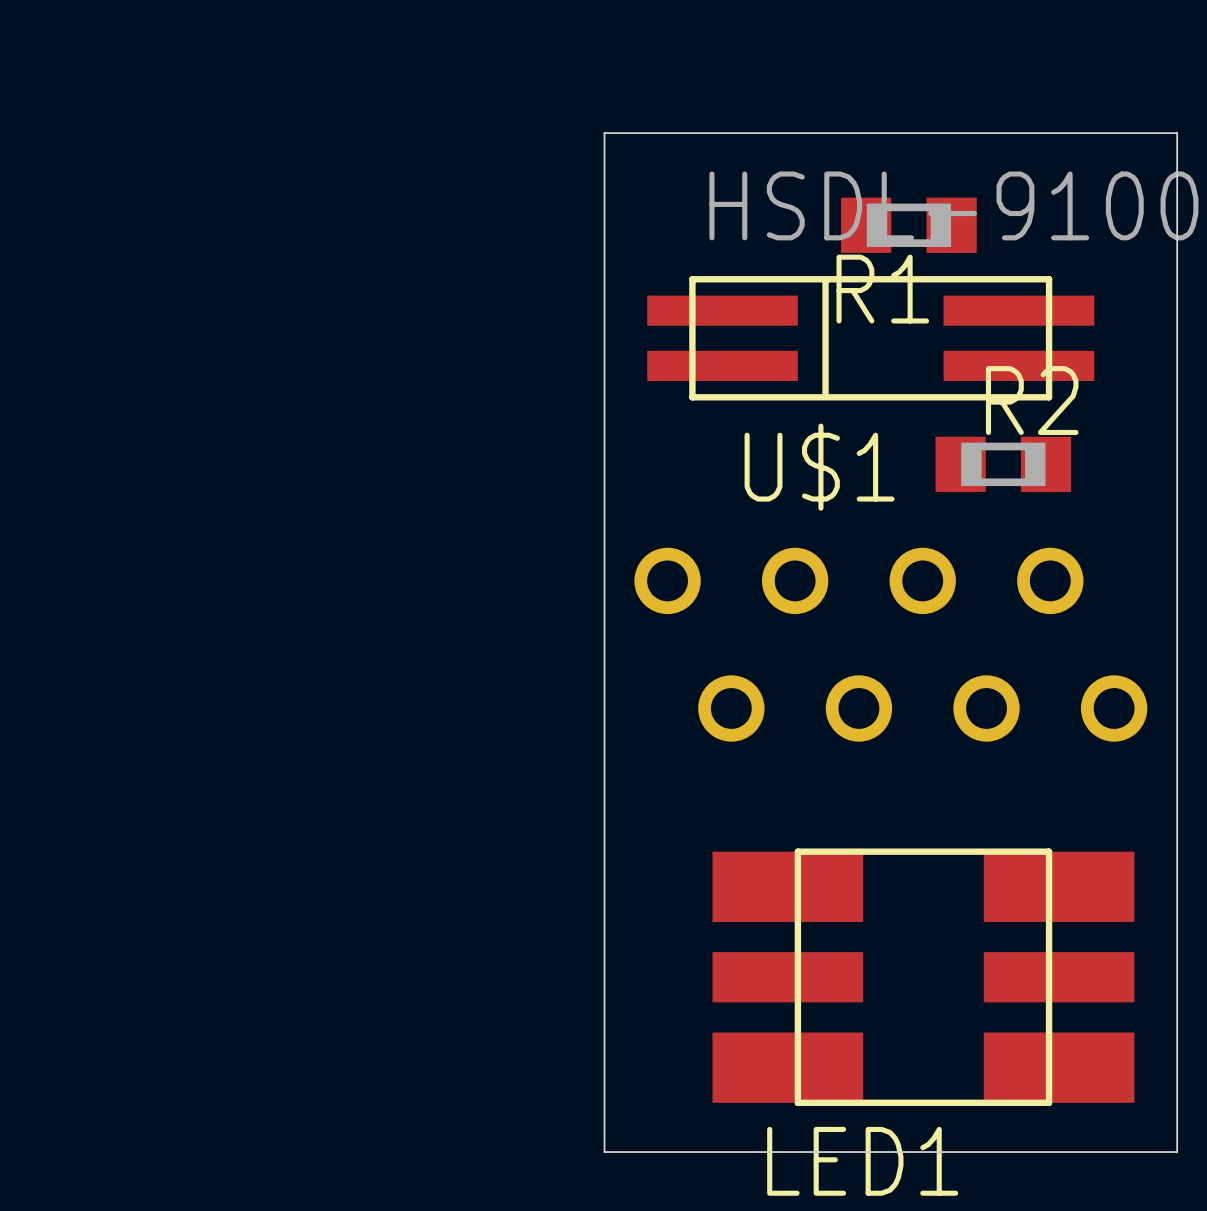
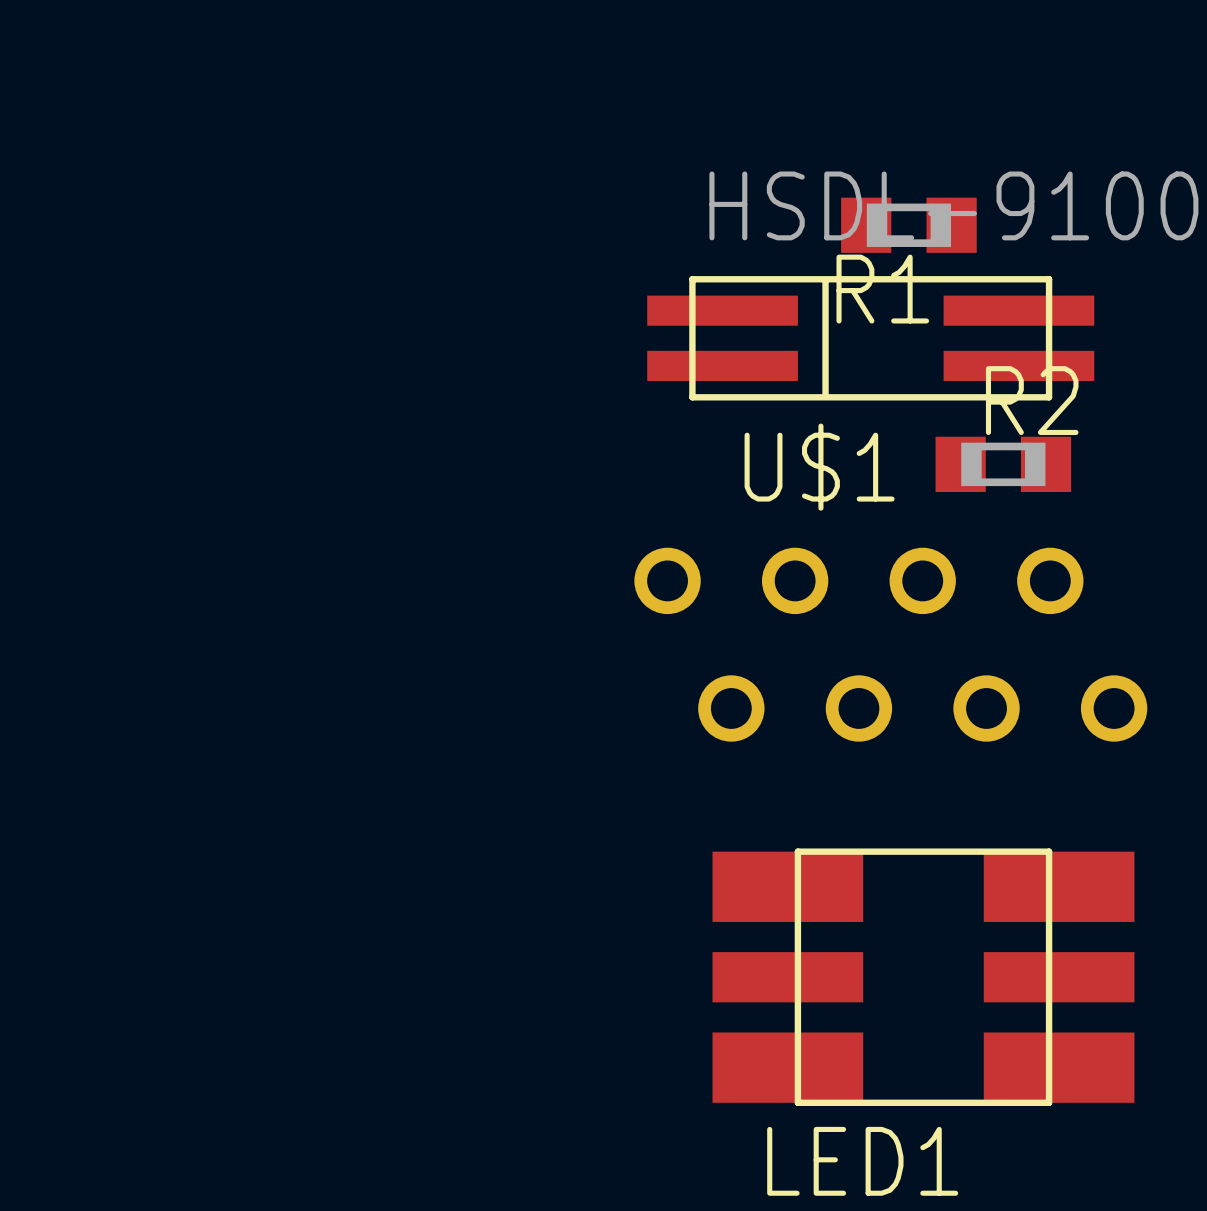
board edge: (604, 133) (1177, 133) (1177, 1152) (604, 1152) (604, 133) -> none

